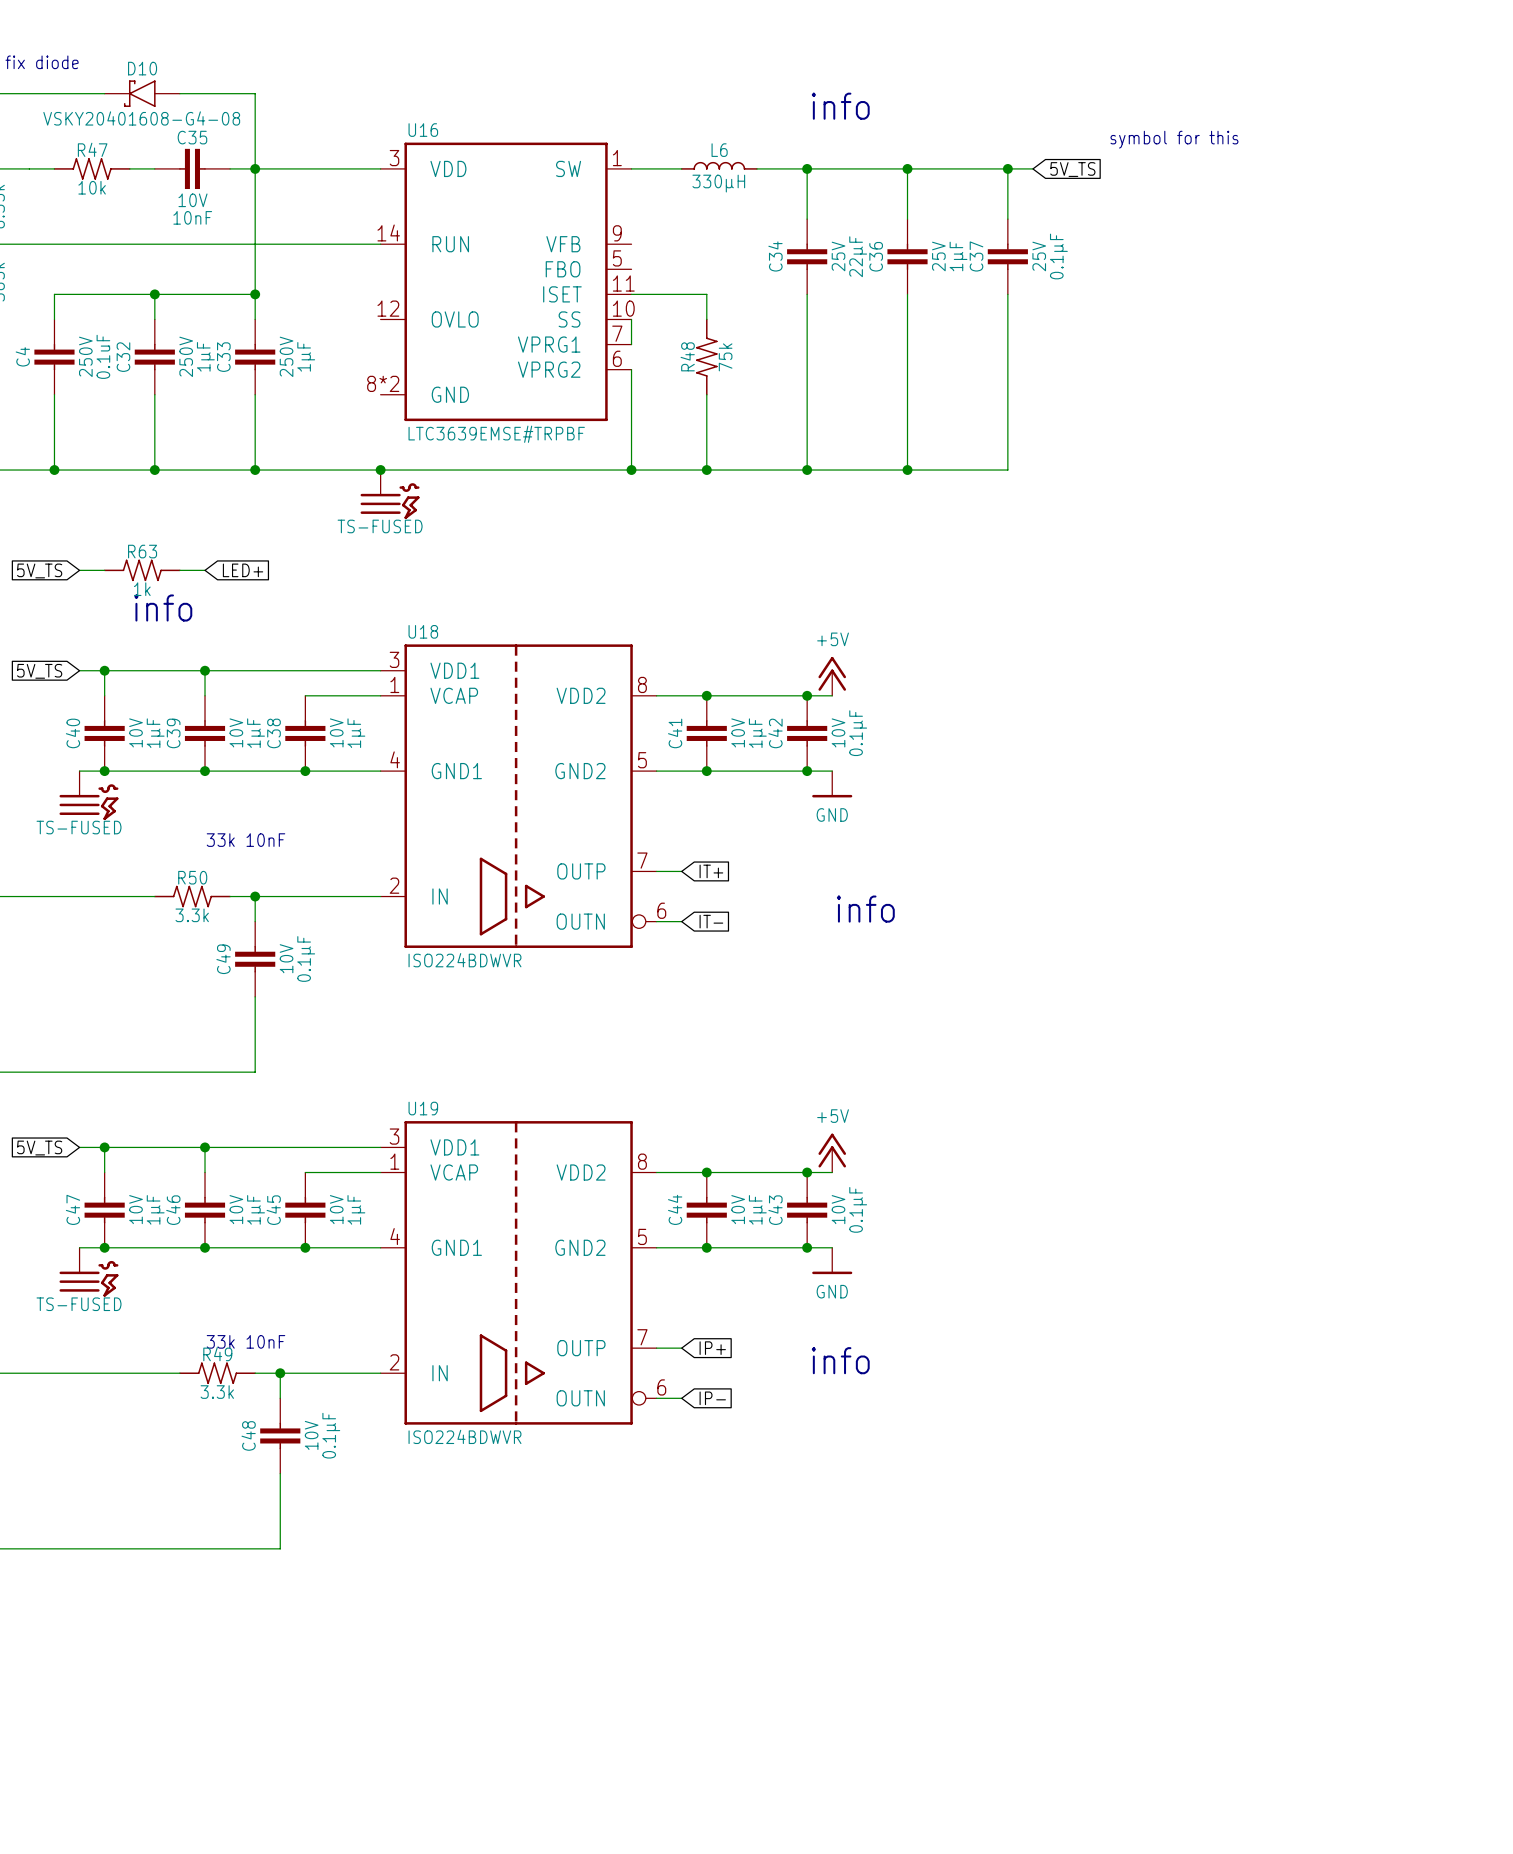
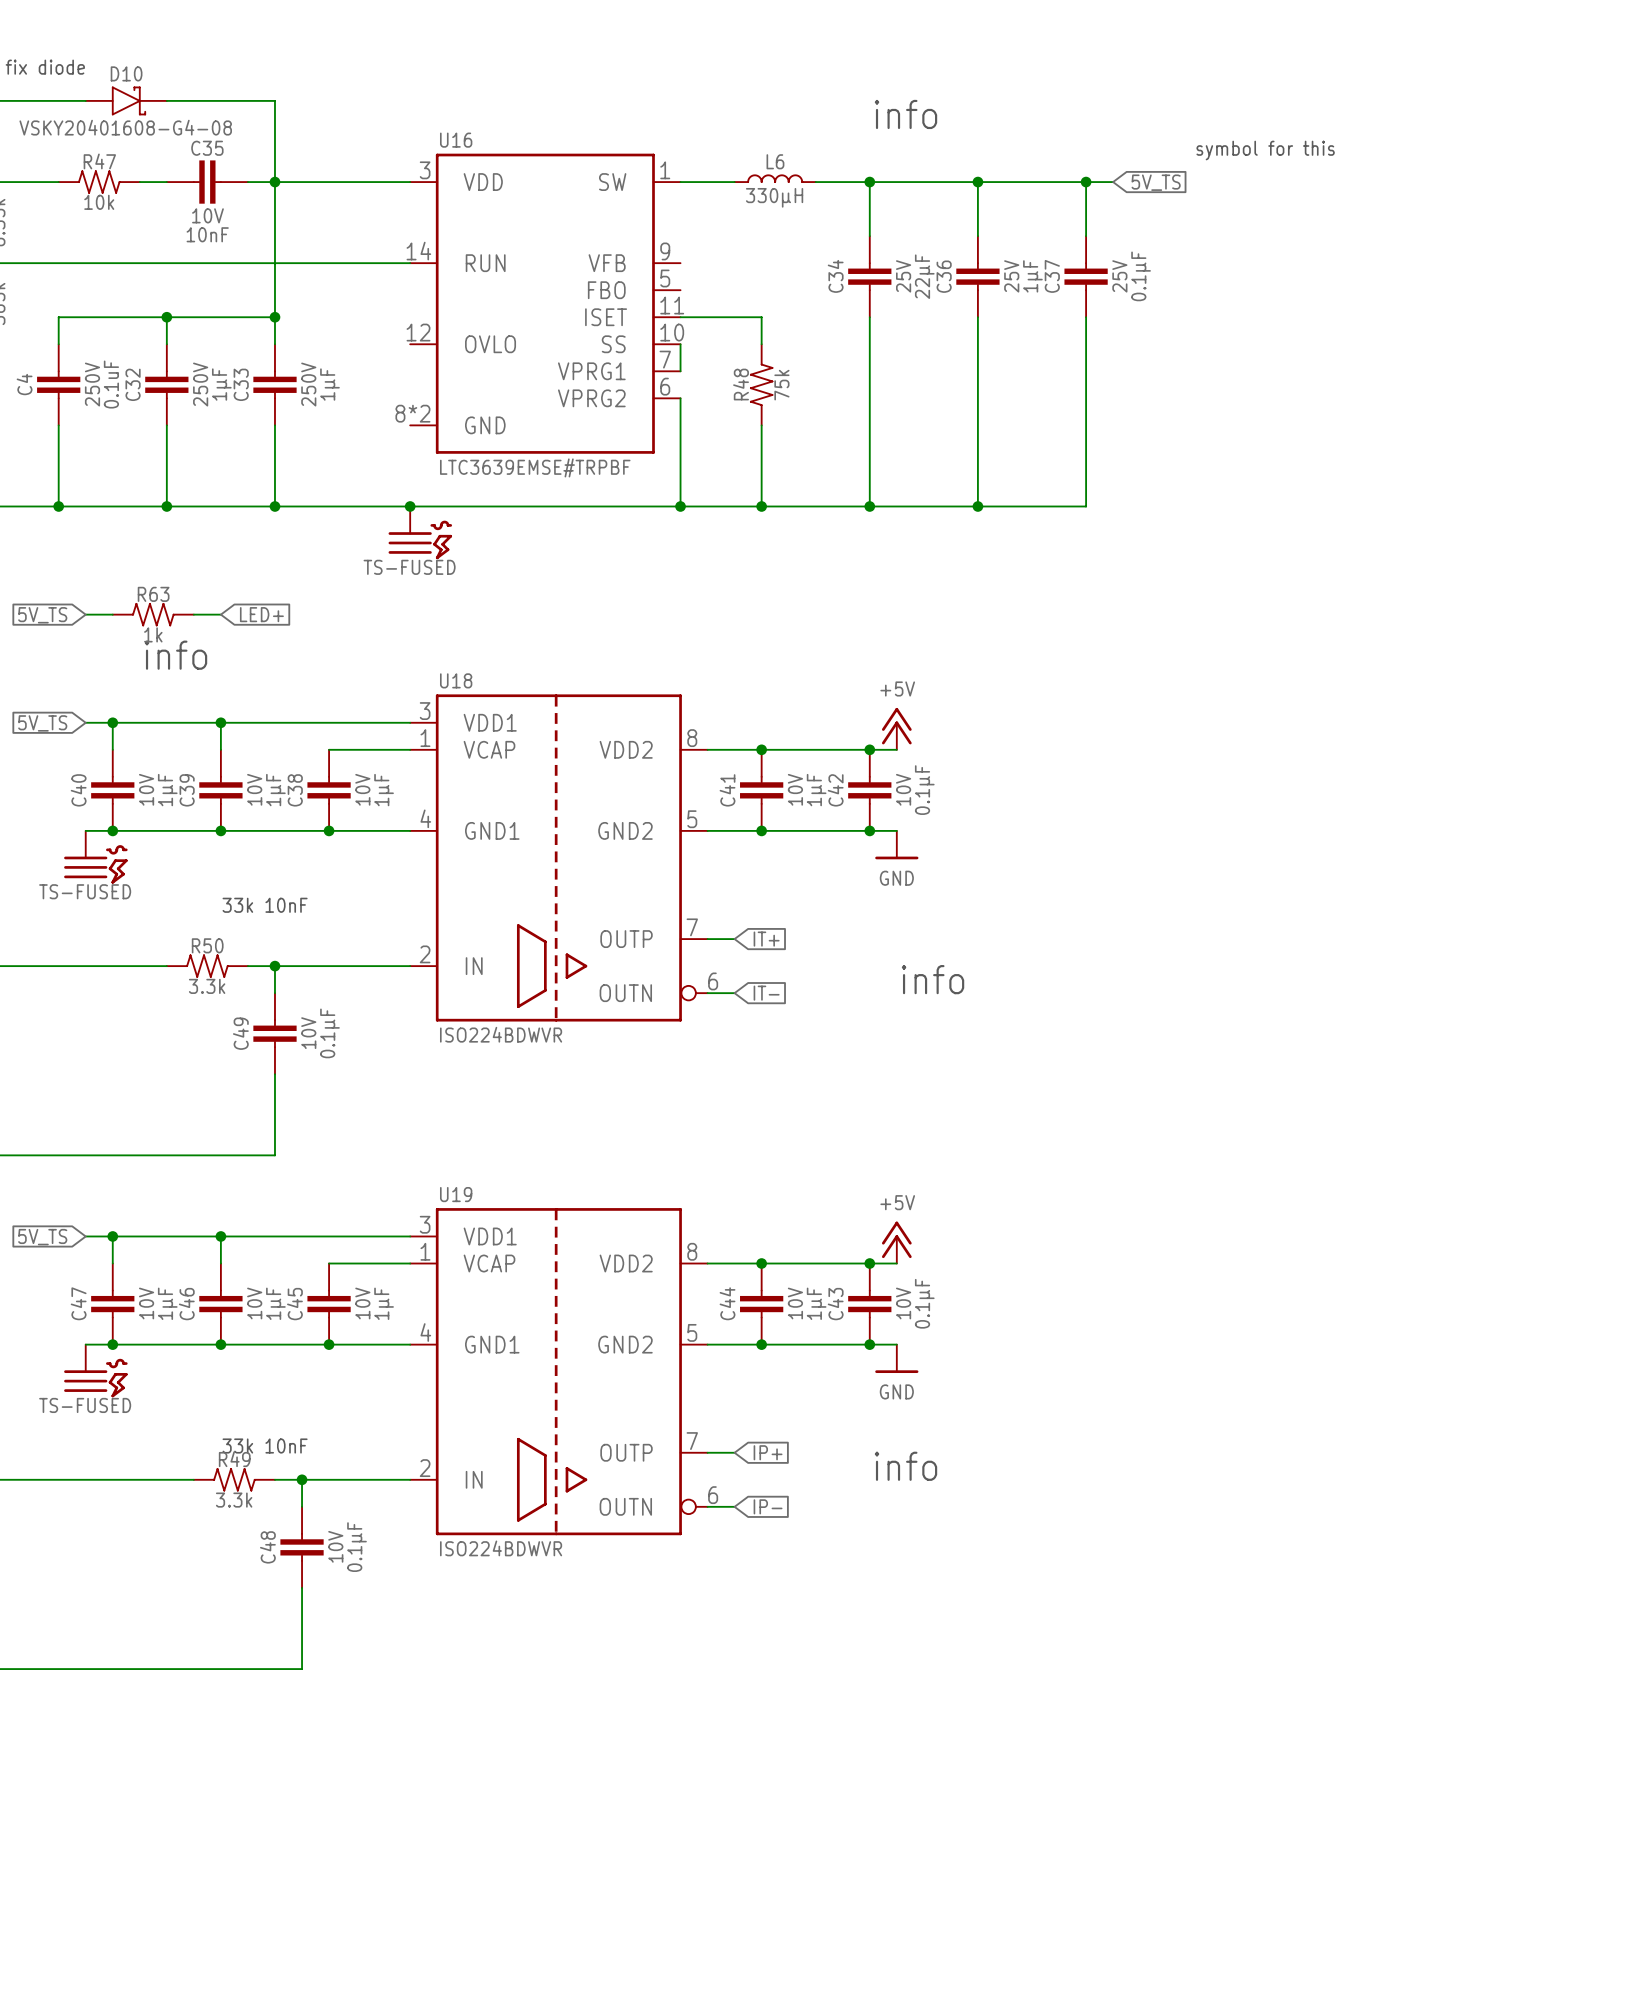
D10 flip: as is (139, 93) -> left-right (128, 100)

